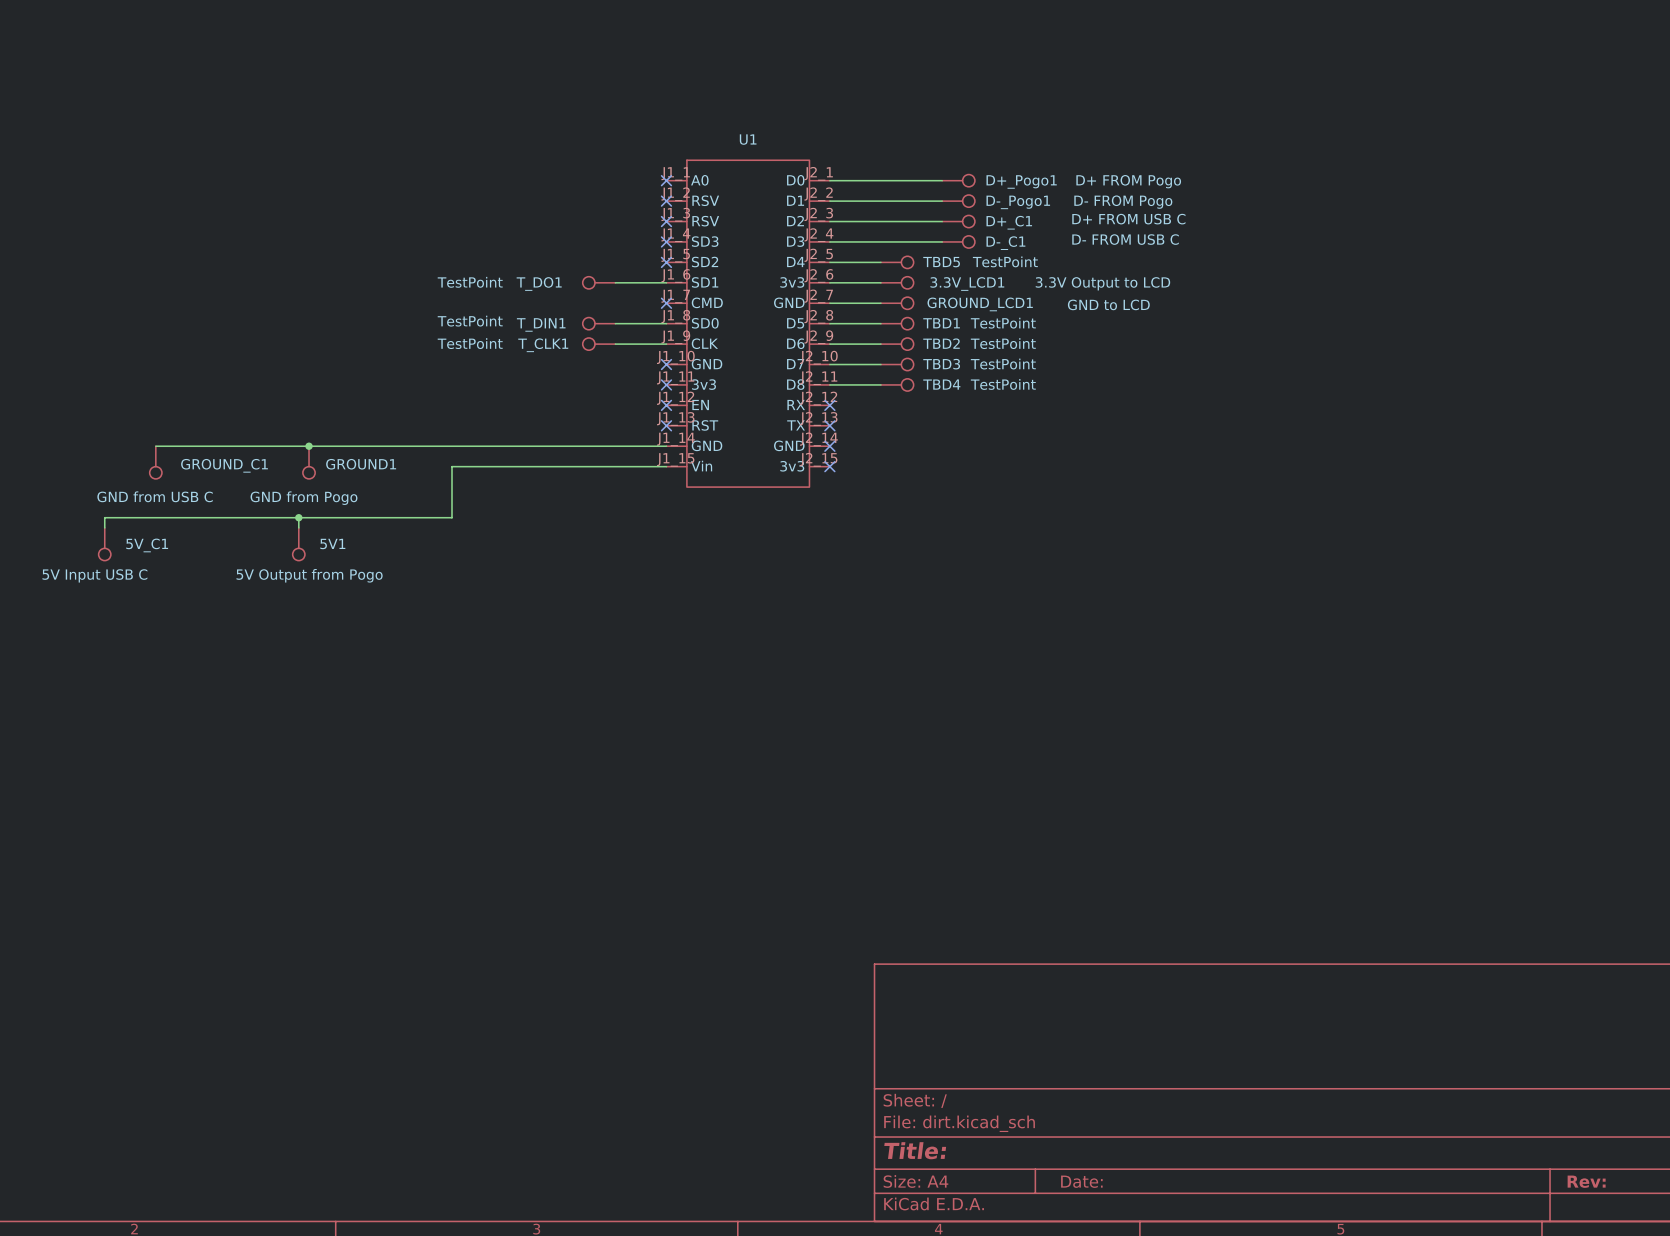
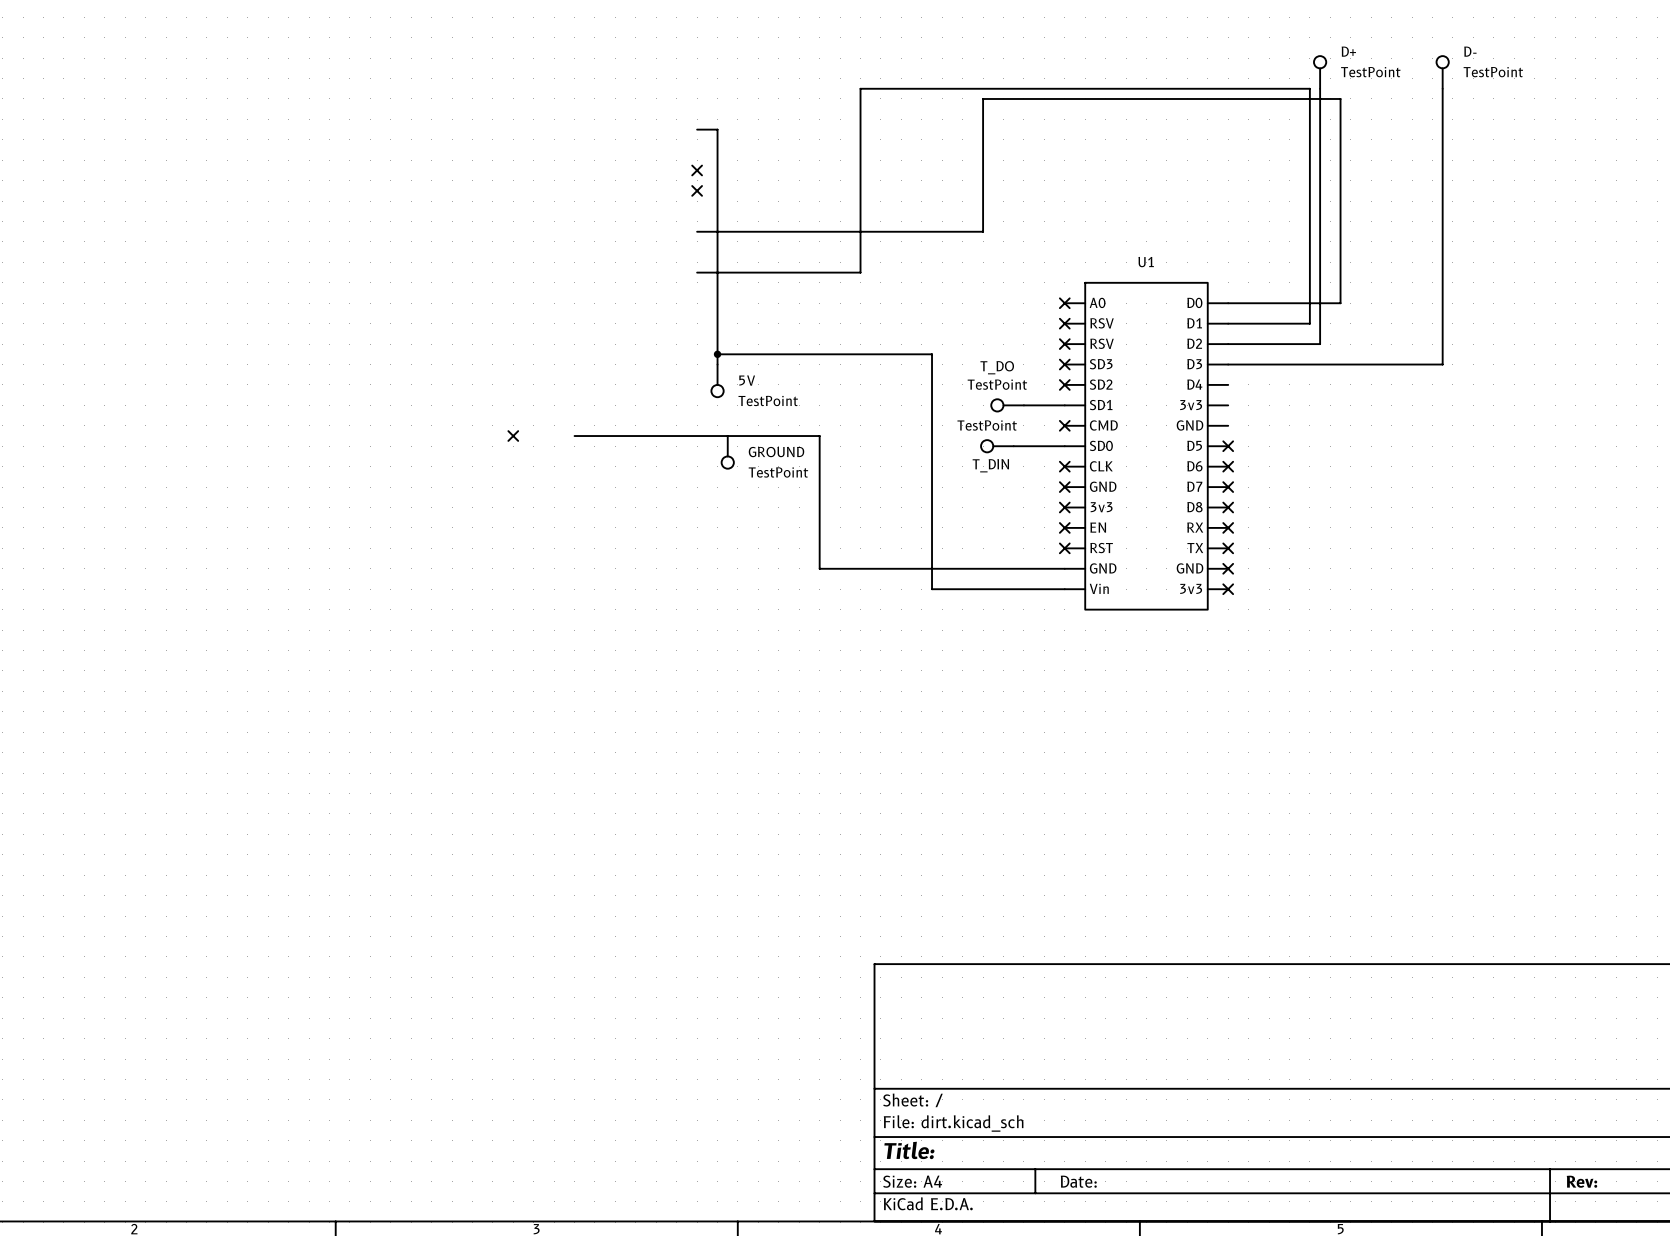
D+: none -> TestPoint (1320, 72)
D-: none -> TestPoint (1442, 72)
wire: none -> (1320, 88) (1320, 344) (1228, 344)
wire: none -> (1442, 88) (1442, 364) (1228, 364)
wire: none -> (697, 129) (717, 129) (717, 364)
U1 symbol: [666, 160, 830, 488] -> [1064, 282, 1229, 610]
no-connect mark: none -> (697, 170)
no-connect mark: (666, 180) -> none
wire: (829, 180) (942, 180) -> none
D+_Pogo1: D+ FROM Pogo (958, 180) -> none
no-connect mark: none -> (697, 190)
no-connect mark: (666, 201) -> none
wire: (829, 201) (942, 201) -> none
D-_Pogo1: D- FROM Pogo (958, 201) -> none
no-connect mark: (666, 221) -> none
wire: (829, 221) (942, 221) -> none
D+_C1: D+ FROM USB C (958, 221) -> none
wire: none -> (697, 231) (983, 231) (983, 98) (1340, 98) (1340, 303) (1228, 303)
no-connect mark: (666, 241) -> none
wire: (829, 241) (942, 241) -> none
D-_C1: D- FROM USB C (958, 241) -> none
no-connect mark: (666, 262) -> none
wire: (829, 262) (880, 262) -> none
TBD5: TestPoint (897, 262) -> none
wire: none -> (697, 272) (860, 272) (860, 88) (1309, 88) (1309, 323) (1228, 323)
T_DO1: TestPoint (599, 282) -> none
wire: (615, 282) (666, 282) -> none
wire: (829, 282) (880, 282) -> none
3.3V_LCD1: 3.3V Output to LCD (897, 282) -> none
no-connect mark: (666, 303) -> none
wire: (829, 303) (880, 303) -> none
GROUND_LCD1: GND to LCD (897, 303) -> none
no-connect mark: none -> (1064, 303)
T_DIN1: TestPoint (599, 323) -> none
wire: (615, 323) (666, 323) -> none
wire: (829, 323) (880, 323) -> none
TBD1: TestPoint (897, 323) -> none
no-connect mark: none -> (1064, 323)
T_CLK1: TestPoint (599, 344) -> none
wire: (615, 344) (666, 344) -> none
wire: (829, 344) (880, 344) -> none
TBD2: TestPoint (897, 344) -> none
no-connect mark: none -> (1064, 344)
wire: none -> (717, 354) (932, 354) (932, 589) (1064, 589)
junction: none -> (717, 354)
no-connect mark: (666, 364) -> none
wire: (829, 364) (880, 364) -> none
TBD3: TestPoint (897, 364) -> none
no-connect mark: none -> (1064, 364)
5V: none -> TestPoint (717, 380)
no-connect mark: (666, 384) -> none
wire: (829, 384) (880, 384) -> (1013, 446) (1064, 446)
TBD4: TestPoint (897, 384) -> none
no-connect mark: none -> (1064, 384)
no-connect mark: (666, 405) -> none
no-connect mark: (829, 405) -> none
T_DO: none -> TestPoint (1007, 405)
wire: none -> (1023, 405) (1064, 405)
no-connect mark: (666, 425) -> none
no-connect mark: (829, 425) -> none
no-connect mark: none -> (1064, 425)
no-connect mark: none -> (513, 436)
wire: none -> (574, 436) (819, 436) (819, 568) (1064, 568)
wire: (155, 446) (666, 446) -> none
junction: (309, 446) -> none
no-connect mark: (829, 446) -> none
T_DIN: none -> TestPoint (997, 446)
no-connect mark: none -> (1228, 446)
GROUND: none -> TestPoint (727, 452)
GROUND_C1: GND from USB C (155, 462) -> none
GROUND1: GND from Pogo (309, 462) -> none
wire: (666, 466) (452, 466) (452, 517) (104, 517) (104, 527) -> none
no-connect mark: (829, 466) -> none
no-connect mark: none -> (1064, 466)
no-connect mark: none -> (1228, 466)
no-connect mark: none -> (1064, 487)
no-connect mark: none -> (1228, 487)
no-connect mark: none -> (1064, 507)
no-connect mark: none -> (1228, 507)
wire: (298, 517) (298, 527) -> none
junction: (298, 517) -> none
no-connect mark: none -> (1064, 527)
no-connect mark: none -> (1228, 527)
5V_C1: 5V Input USB C (104, 544) -> none
5V1: 5V Output from Pogo (298, 544) -> none
no-connect mark: none -> (1064, 548)
no-connect mark: none -> (1228, 548)
no-connect mark: none -> (1228, 568)
no-connect mark: none -> (1228, 589)

